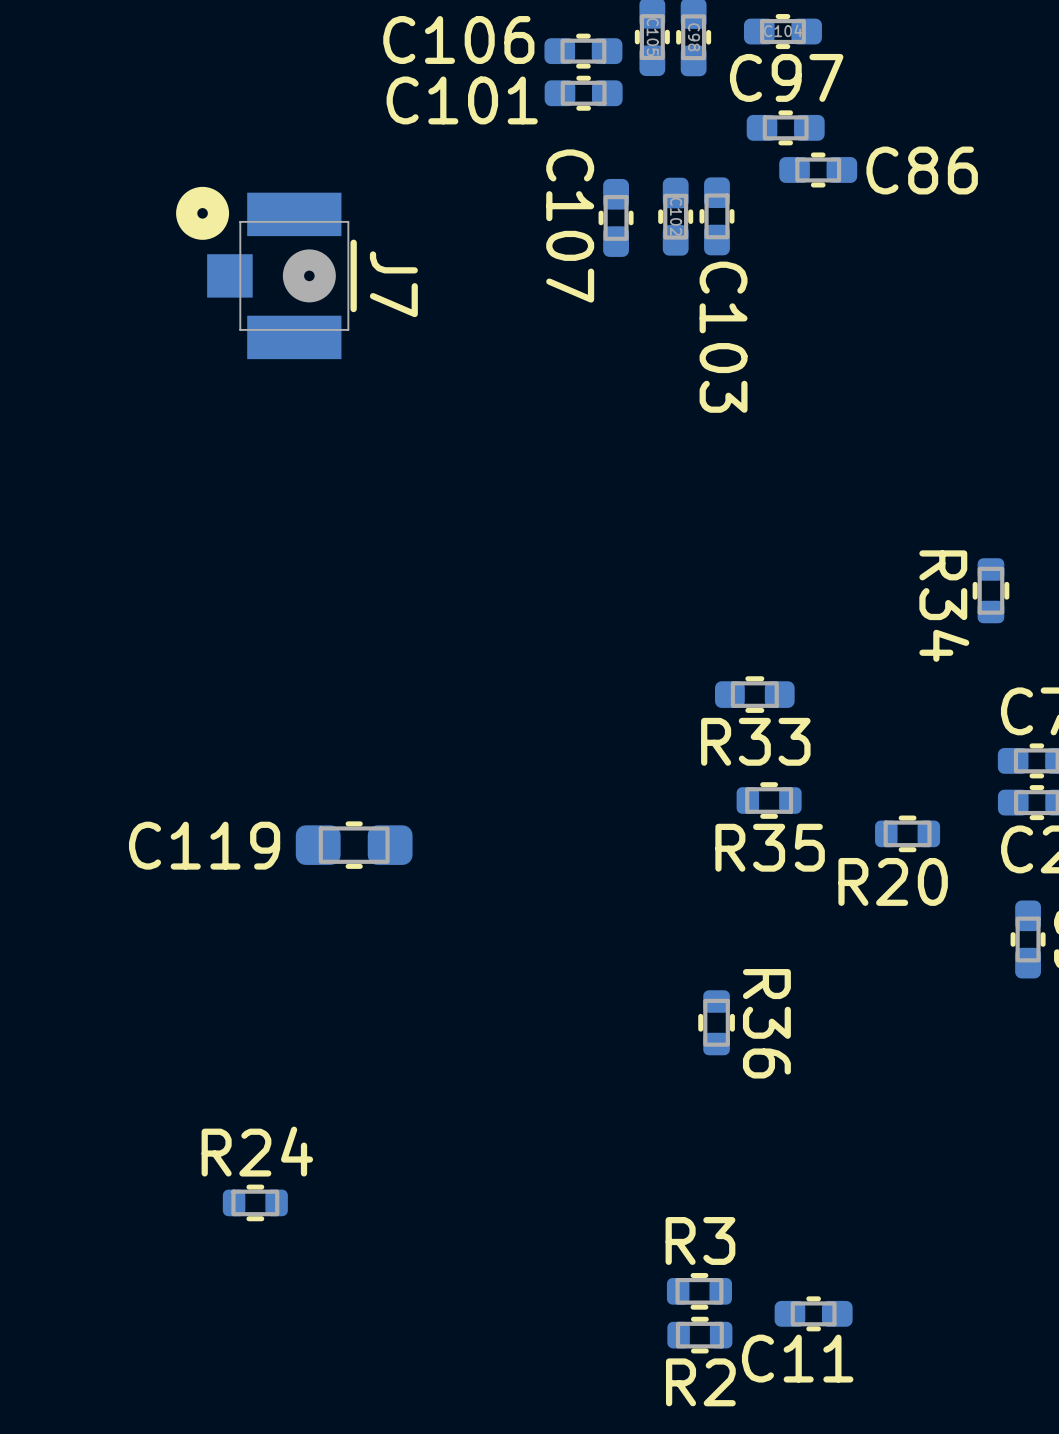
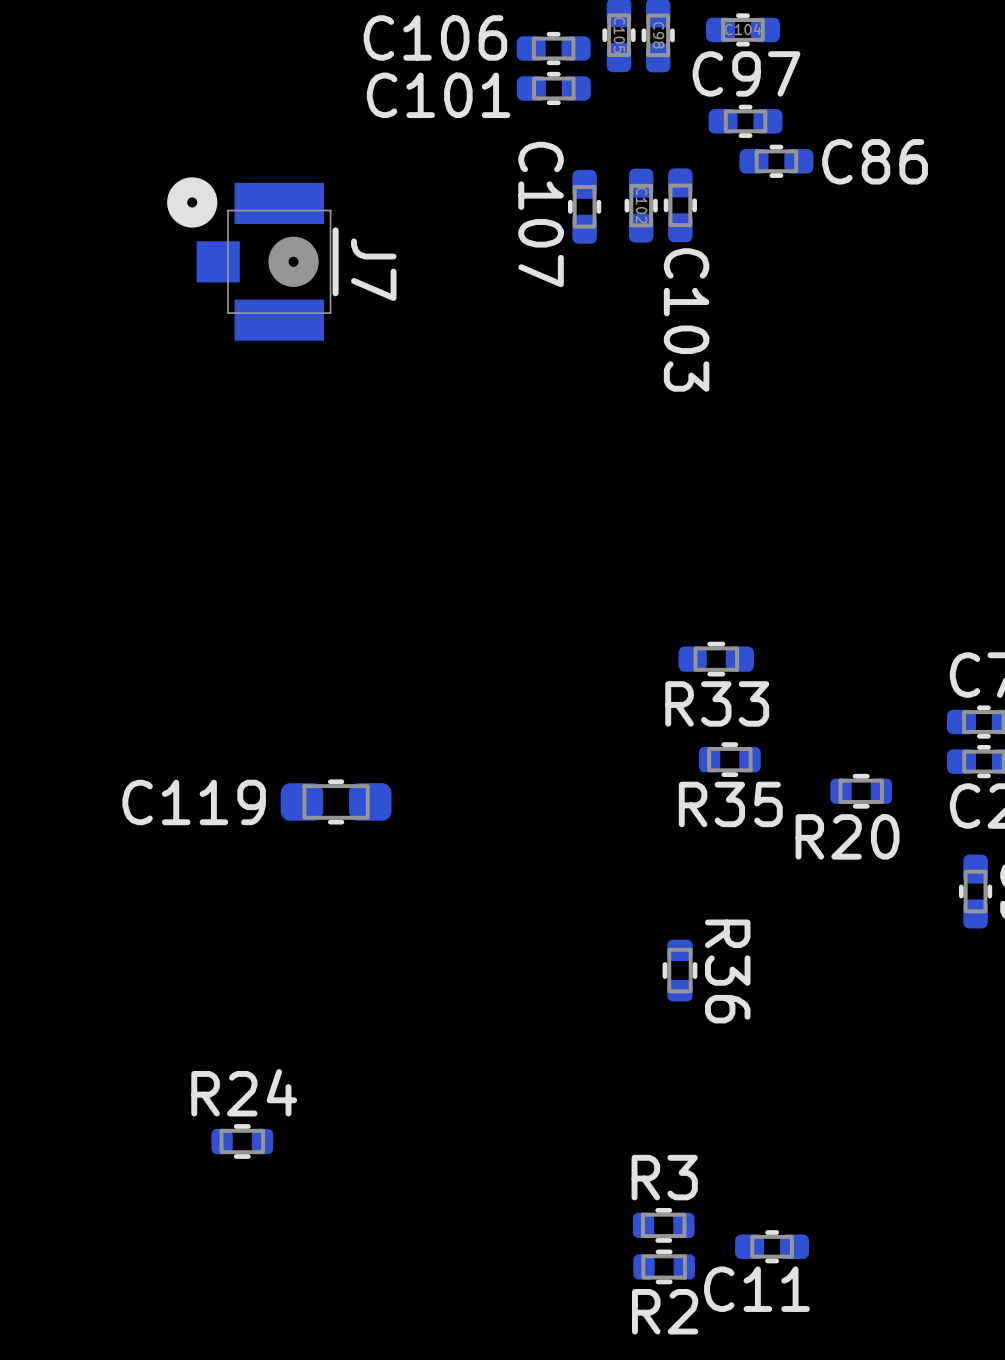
R34: (990, 590) -> none

